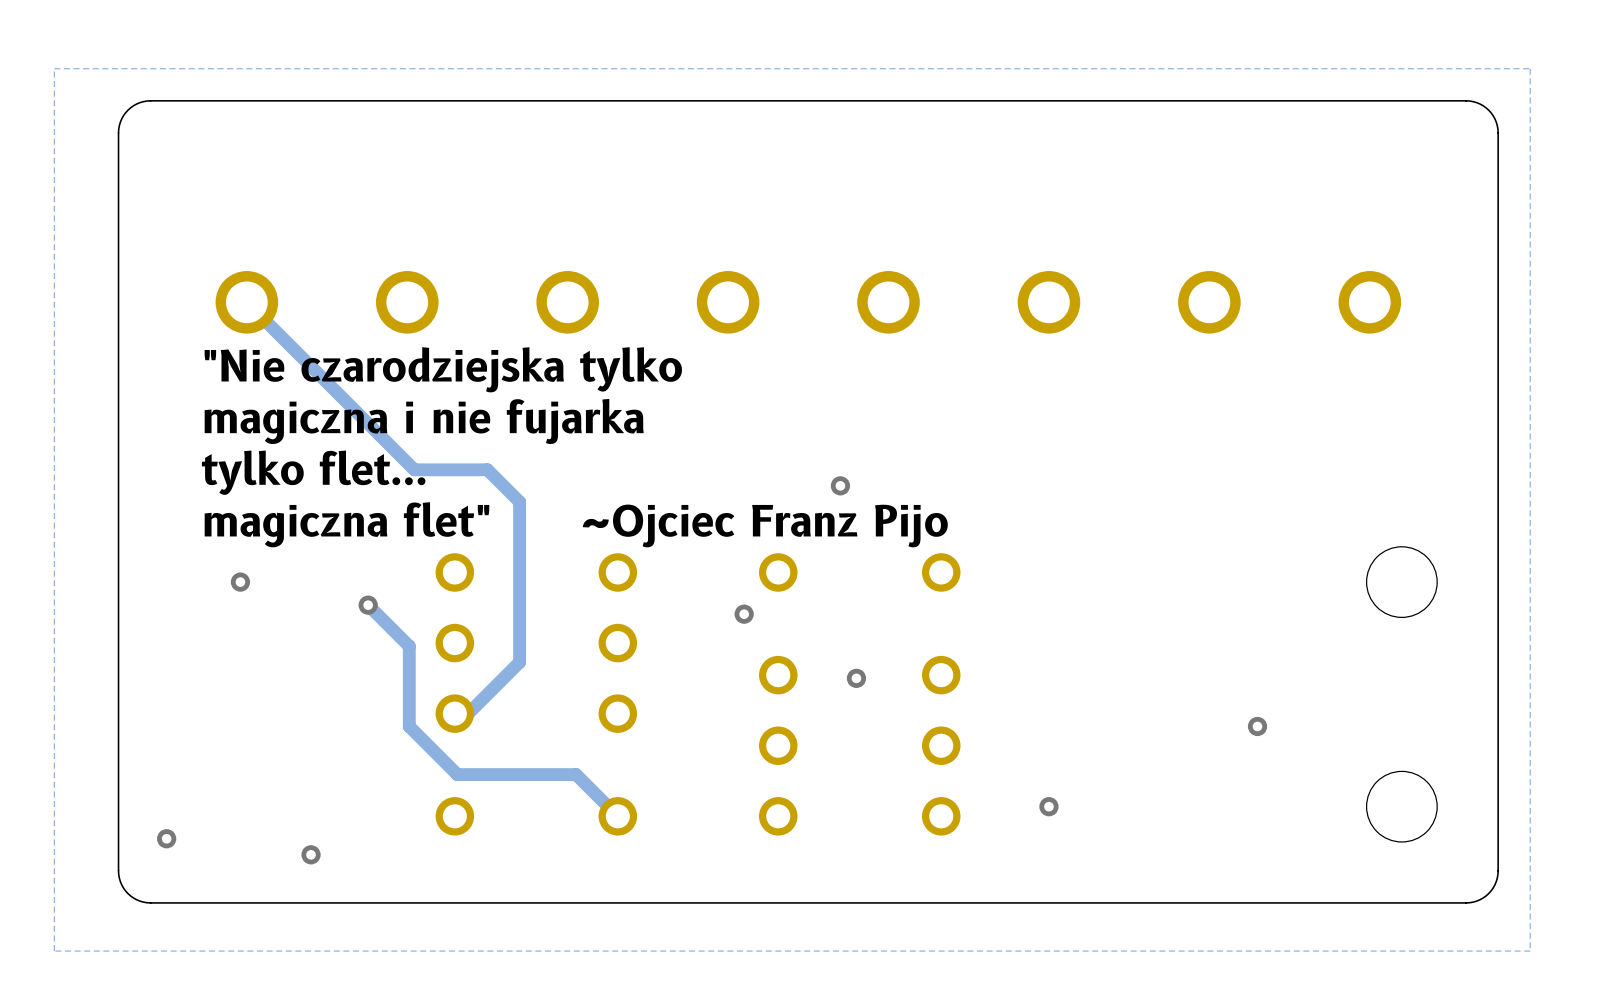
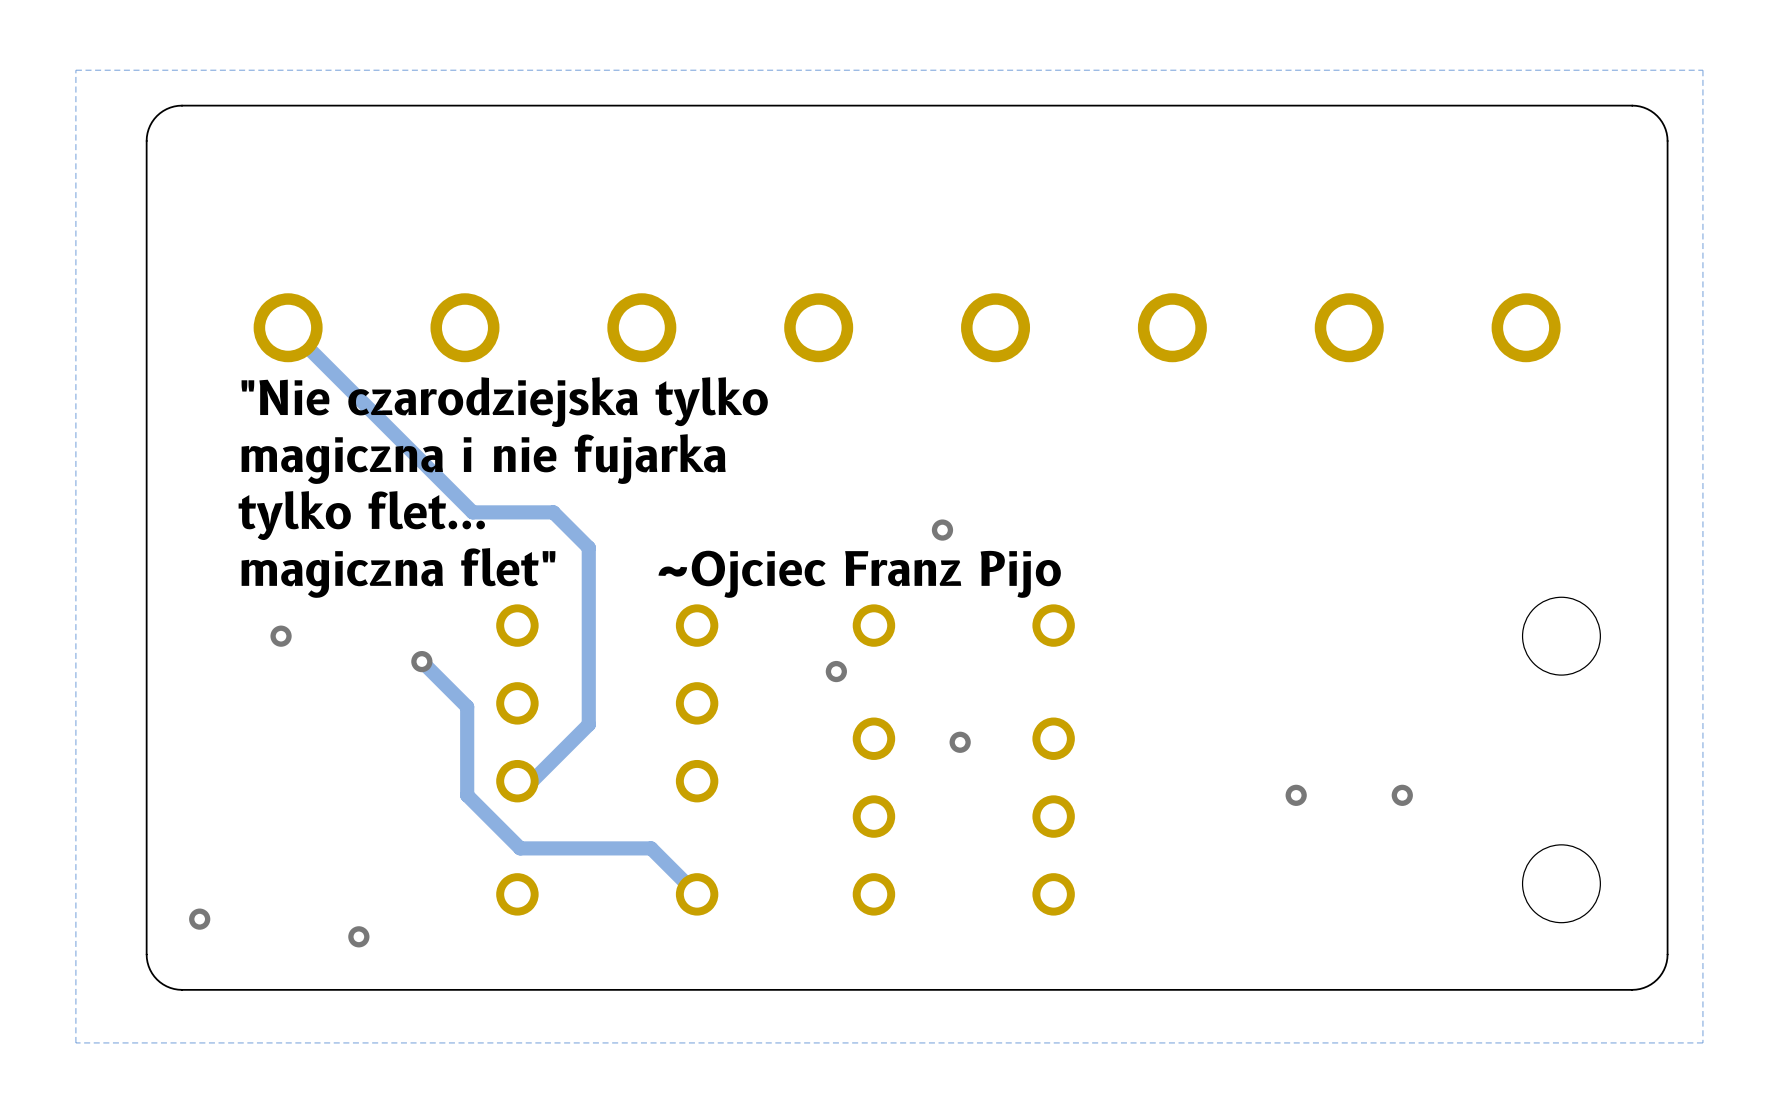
via position: (1048, 806) -> (1296, 795)

